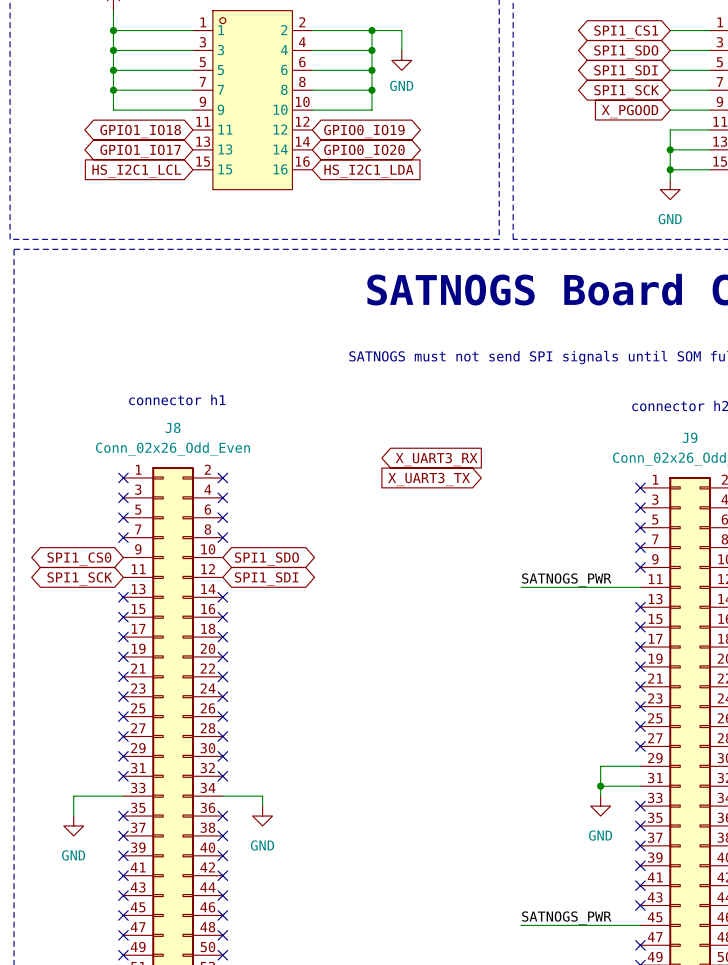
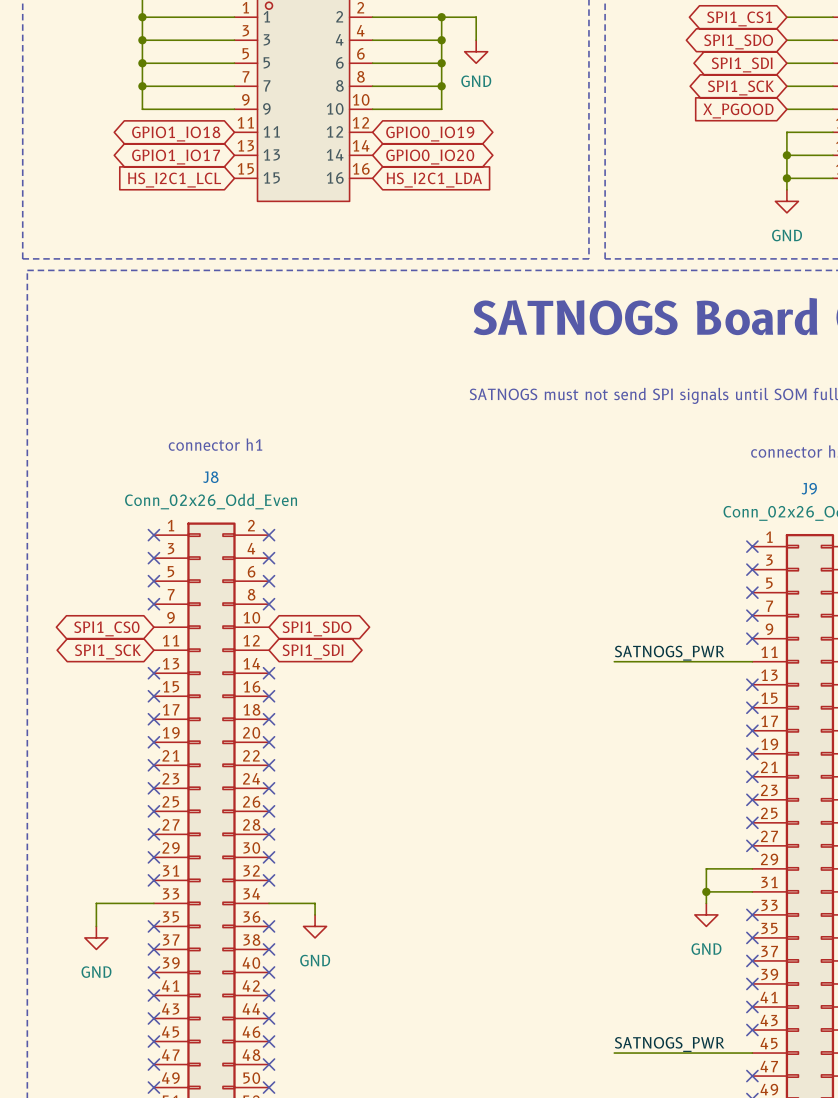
global label: X_UART3_RX (436, 459) -> none
global label: X_UART3_TX (429, 479) -> none

